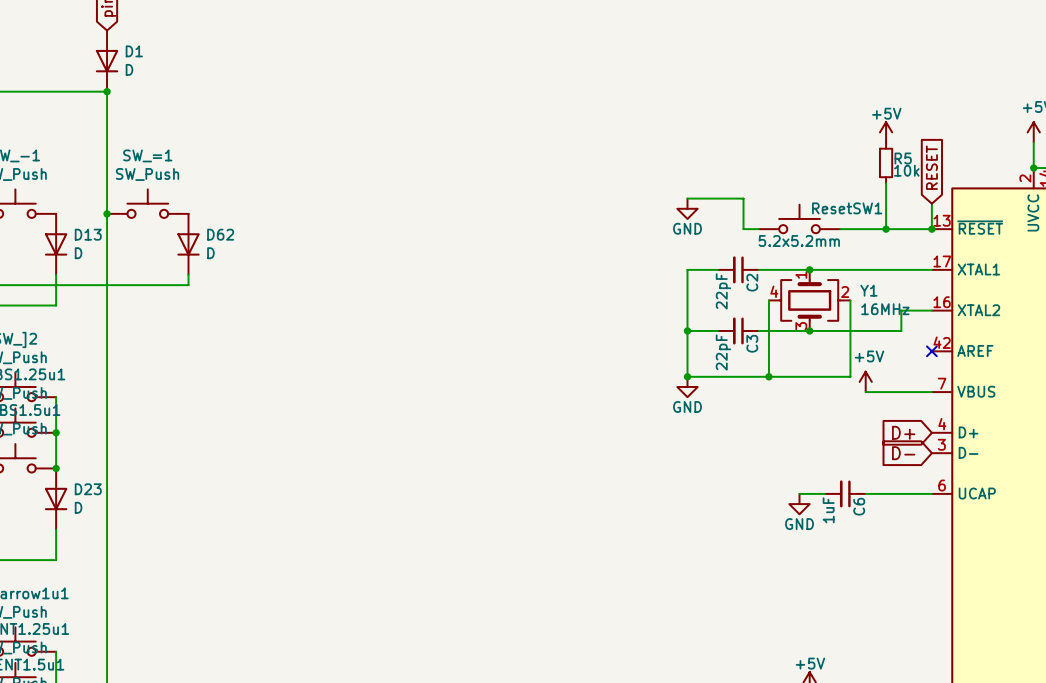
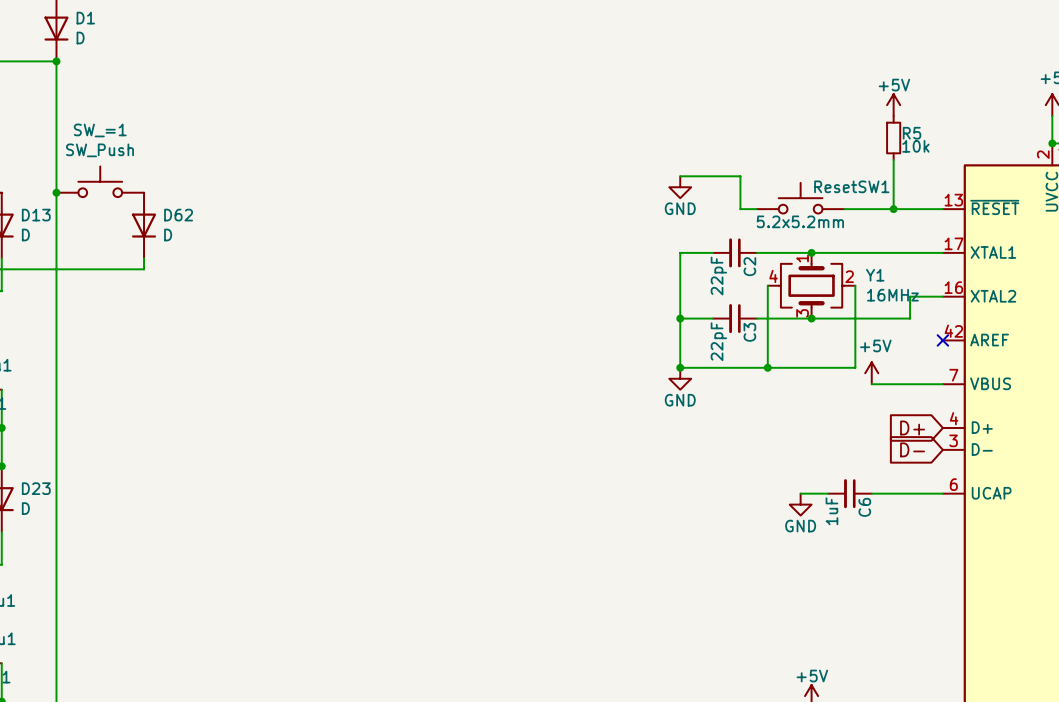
global label: RESET (931, 167) -> none
wire: (931, 203) (931, 229) -> none
junction: (931, 229) -> none

